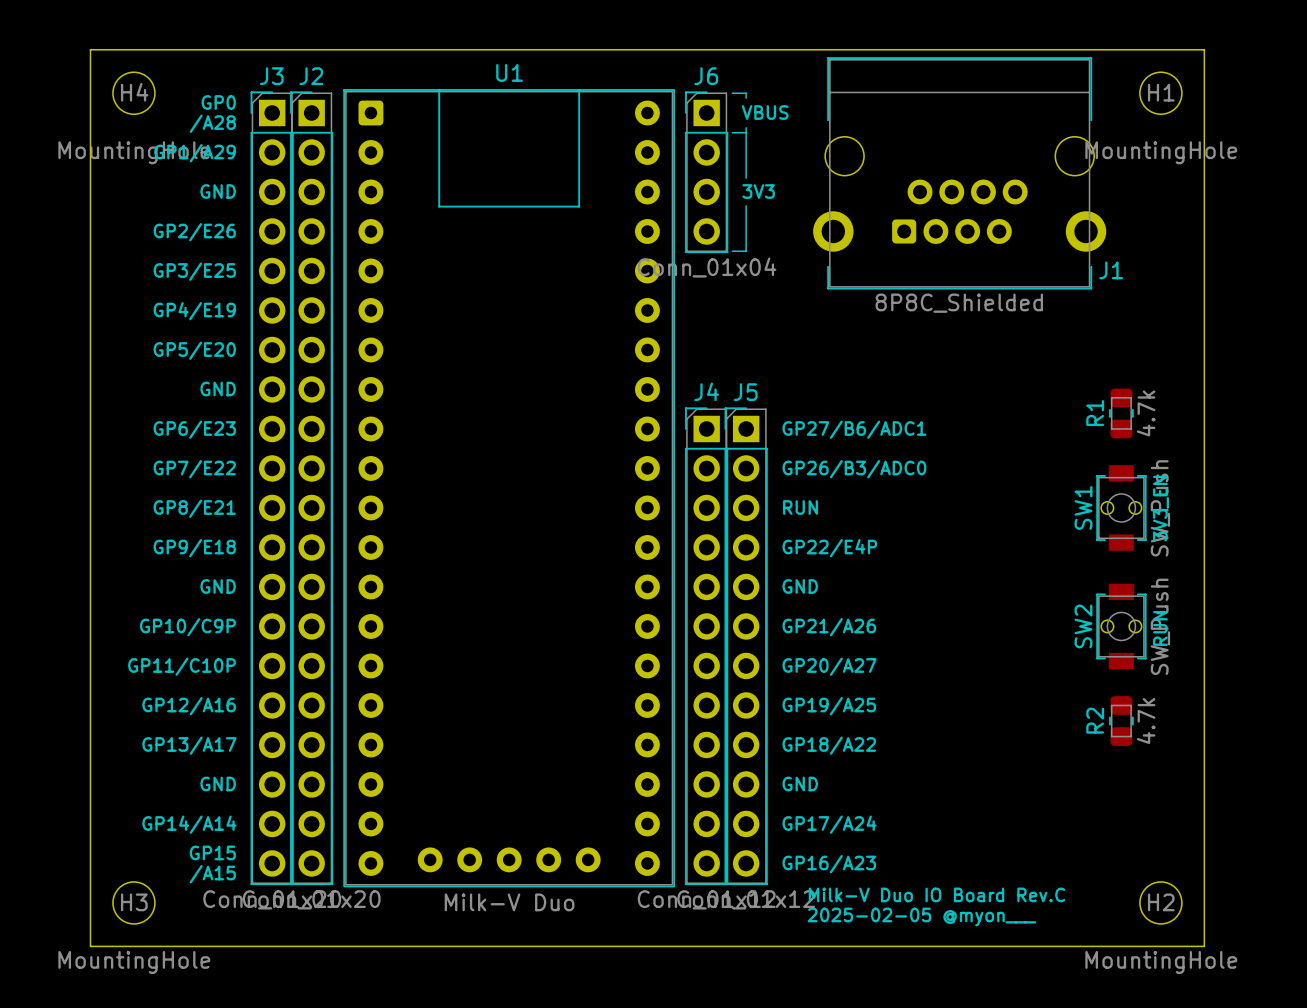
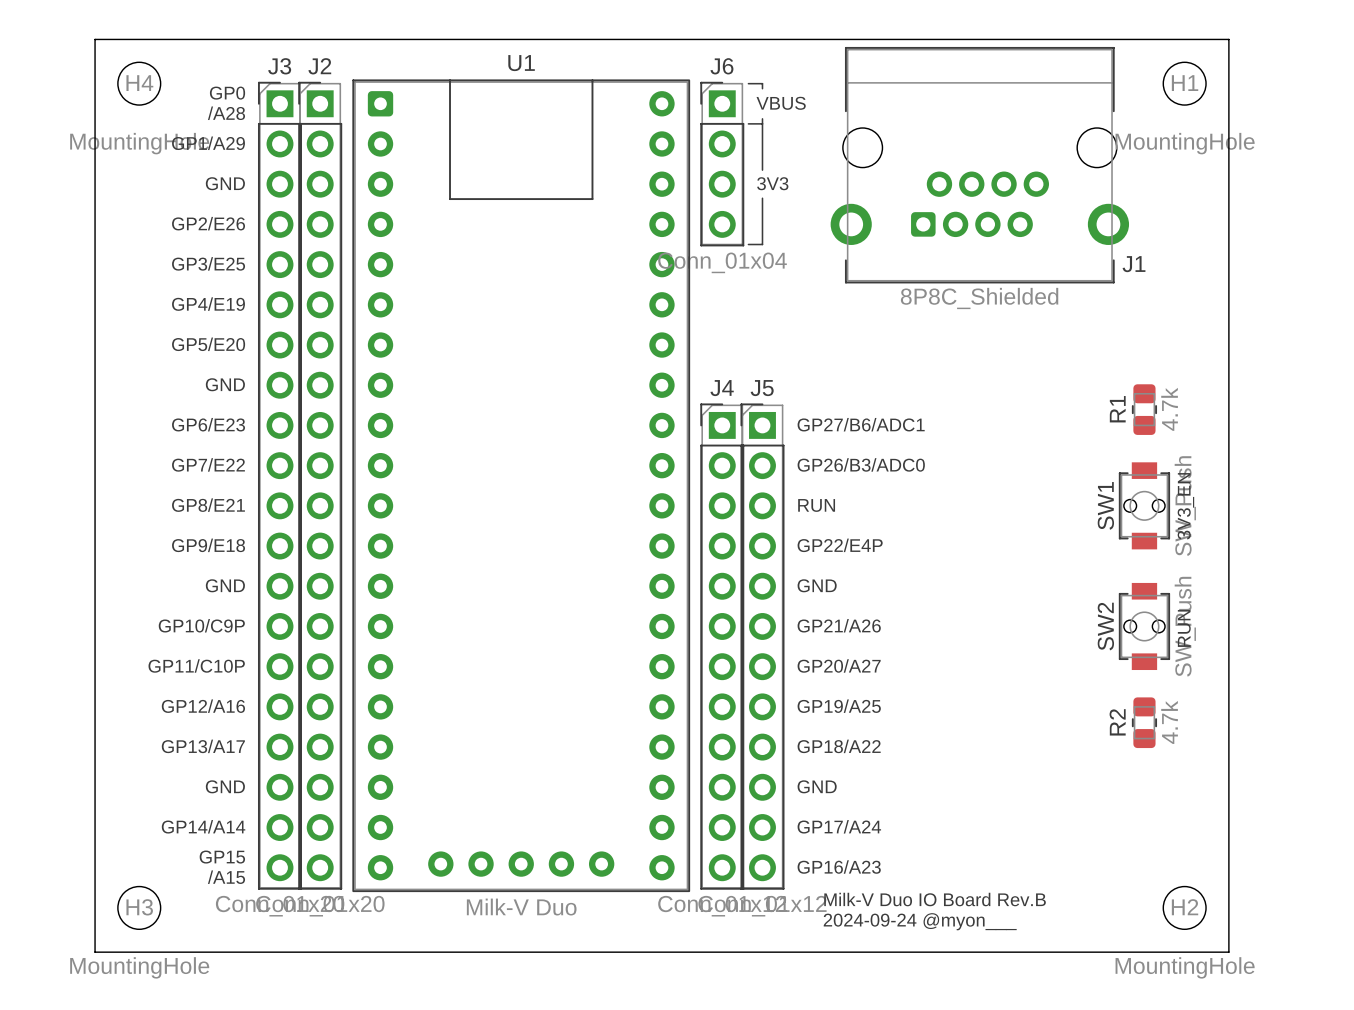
text: Milk-V Duo IO Board Rev.C (936, 894) -> Milk-V Duo IO Board Rev.B (935, 899)
text: 2025-02-05 @myon___ (921, 917) -> 2024-09-24 @myon___ (920, 921)

